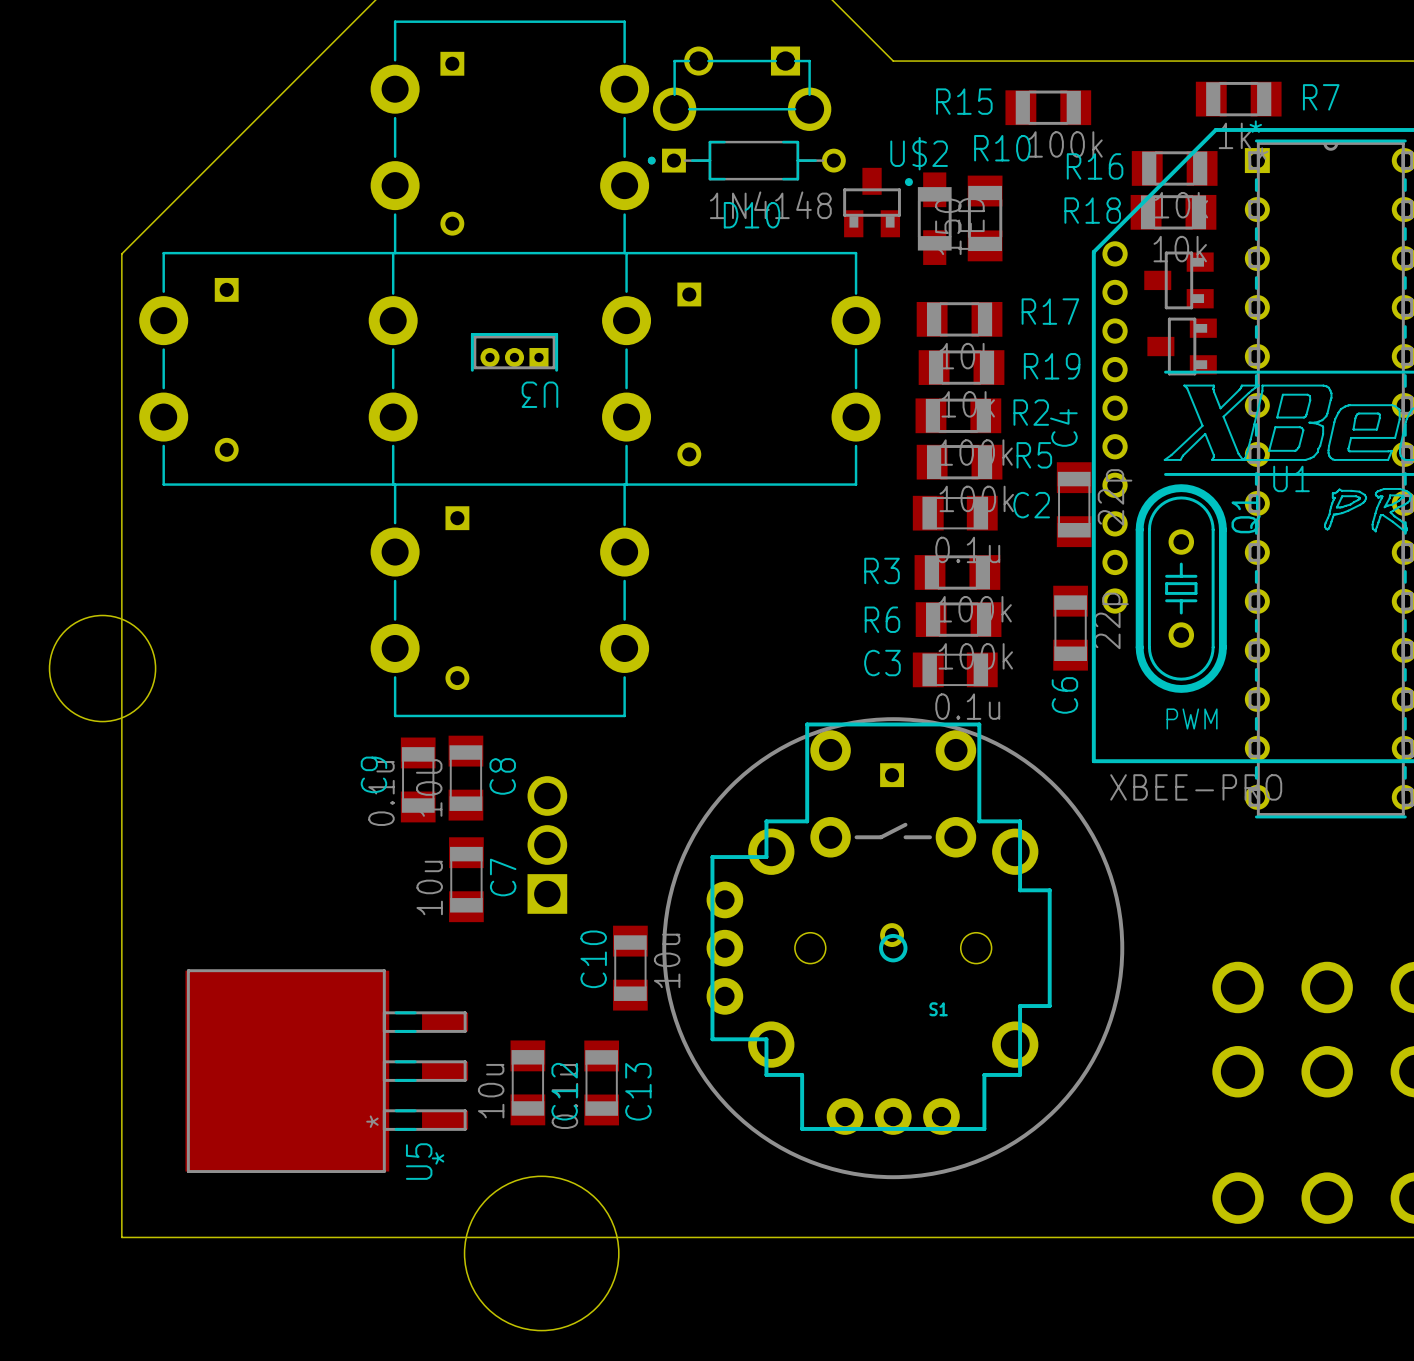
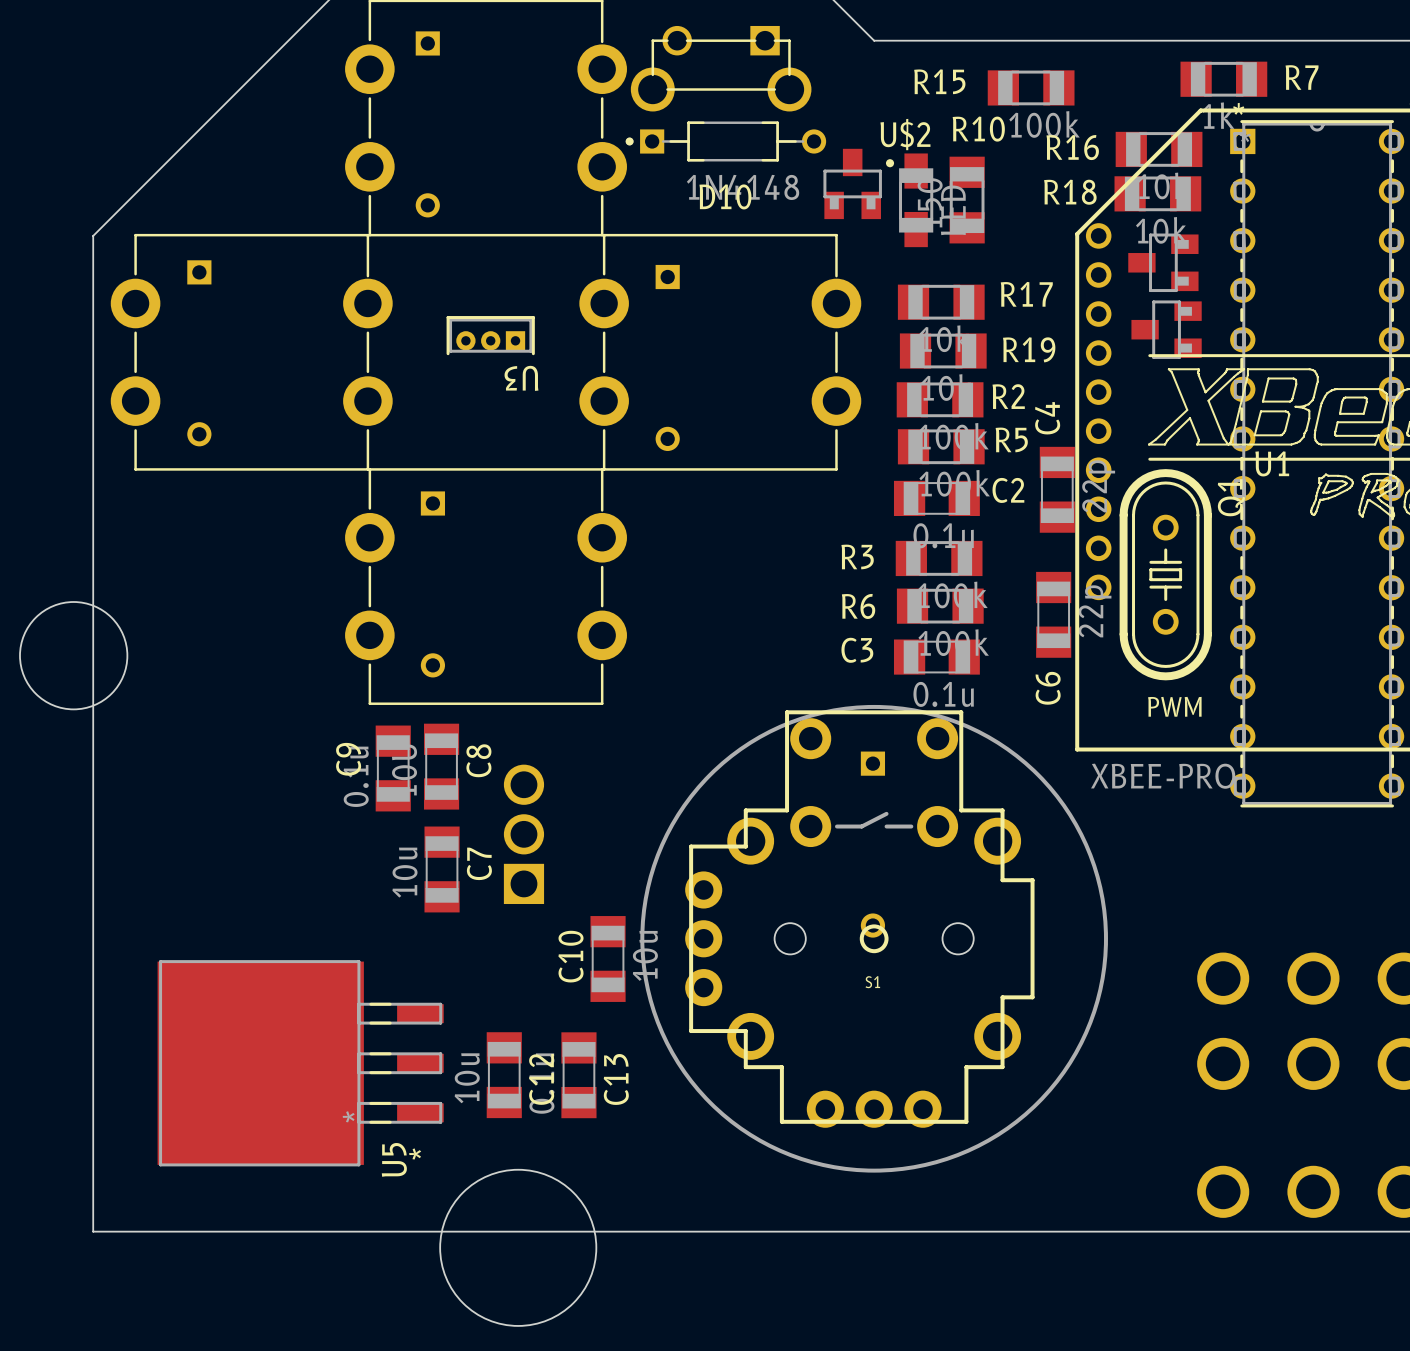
S1 name position: S1 (938, 1009) -> S1 (872, 982)

